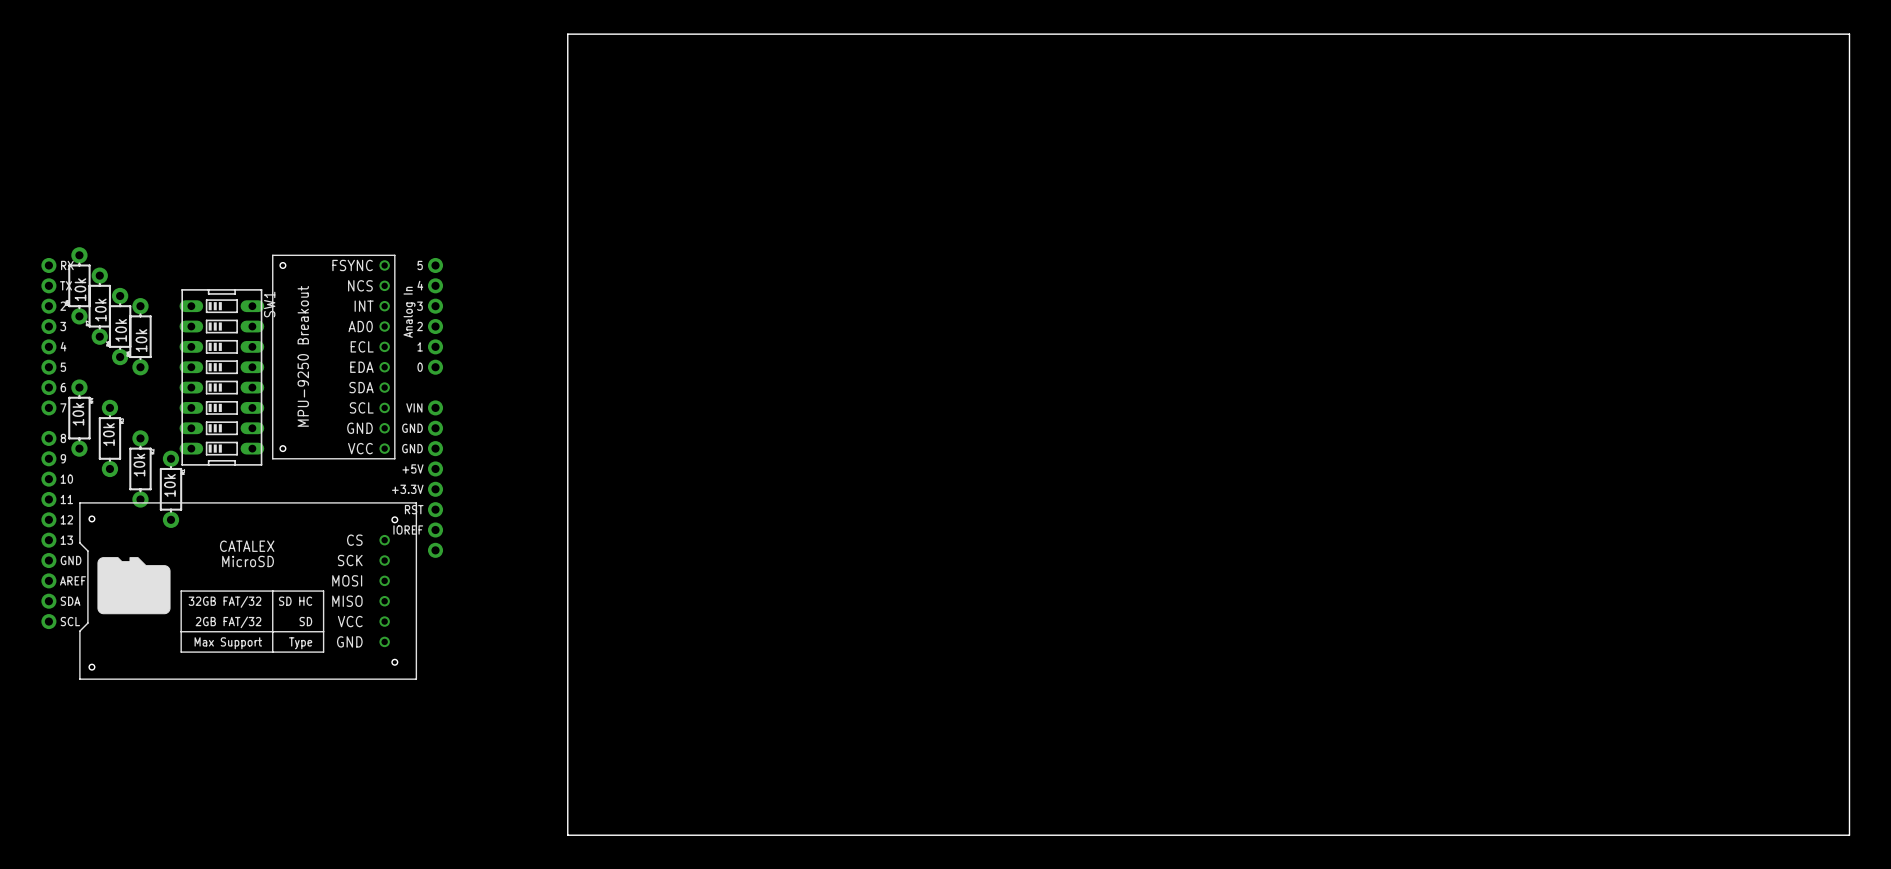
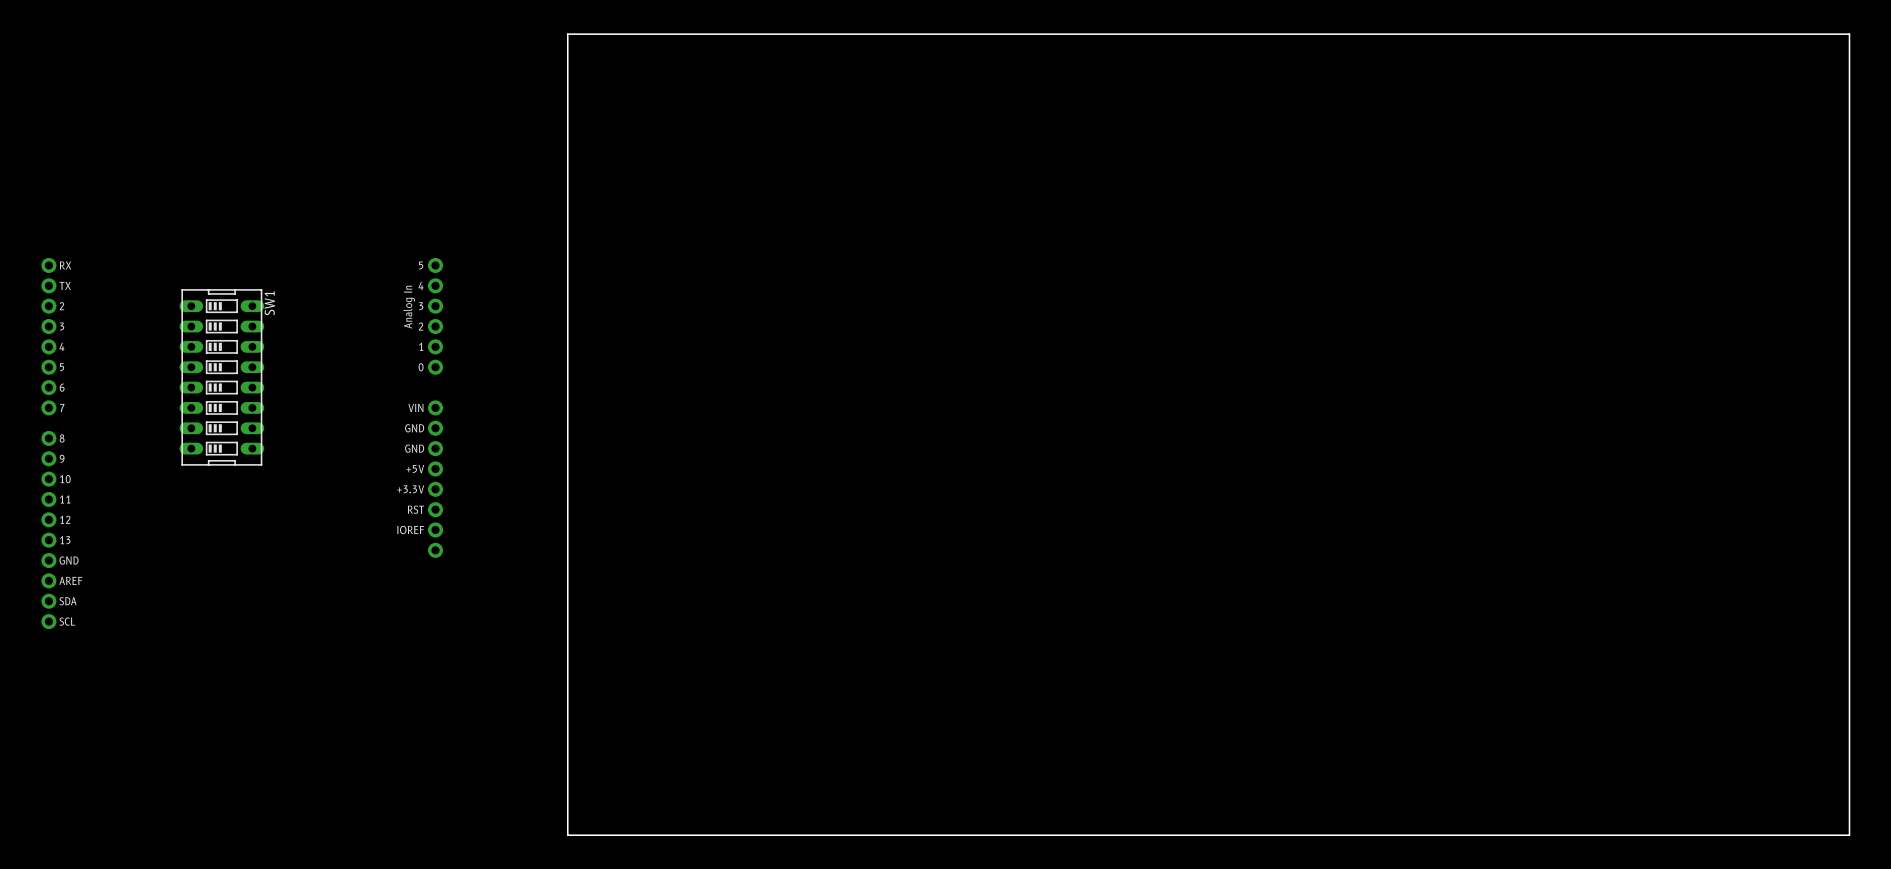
part: 10k (79, 285) -> none
part: 10k (99, 306) -> none
part: 10k (120, 326) -> none
part: 10k (140, 336) -> none
part: (333, 357) -> none
part: 10k (79, 418) -> none
part: 10k (109, 438) -> none
part: 10k (140, 468) -> none
part: 10k (171, 489) -> none
part: (248, 591) -> none

